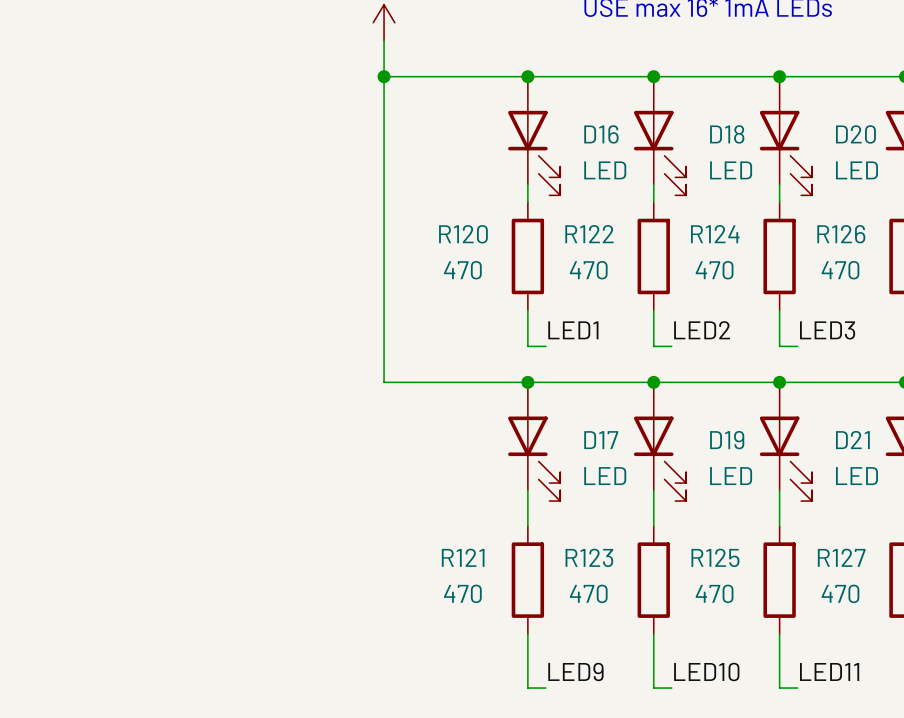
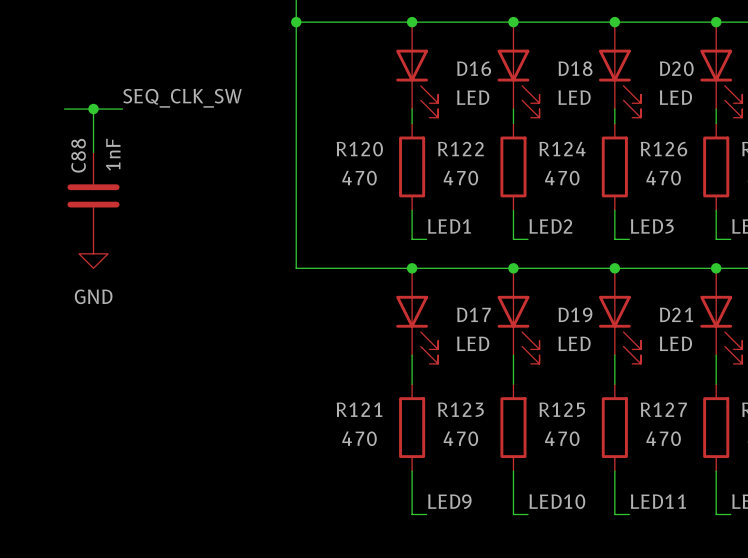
label: none -> SEQ_CLK_SW (182, 98)
wire: none -> (64, 109) (122, 109)
wire: none -> (93, 109) (93, 152)
junction: none -> (93, 109)
C88: none -> 1nF (93, 195)
power symbol: none -> GND (93, 253)

